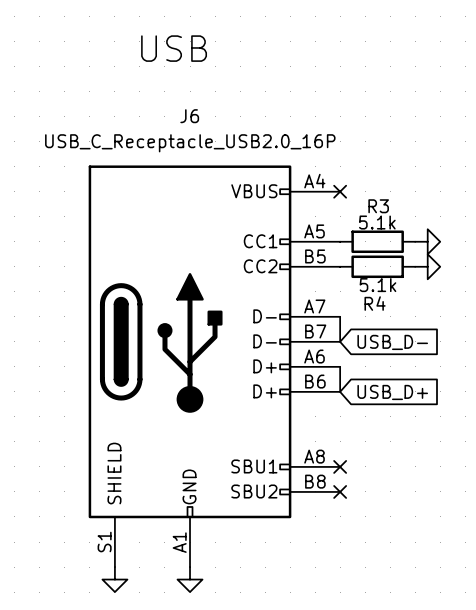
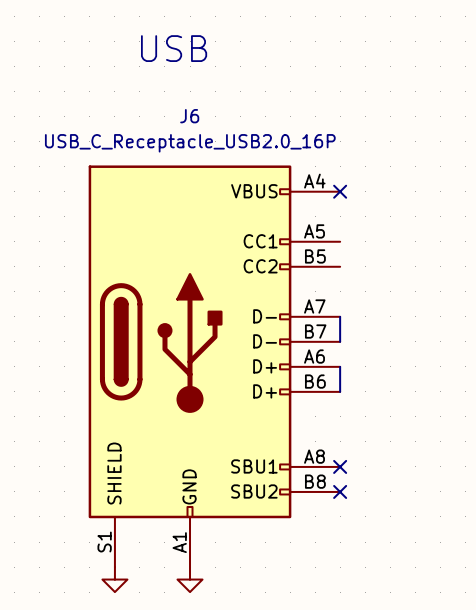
R3: 5.1k (377, 241) -> none
power symbol: (427, 241) -> none
R4: 5.1k (377, 266) -> none
power symbol: (427, 266) -> none
global label: USB_D- (392, 342) -> none
global label: USB_D+ (392, 392) -> none

